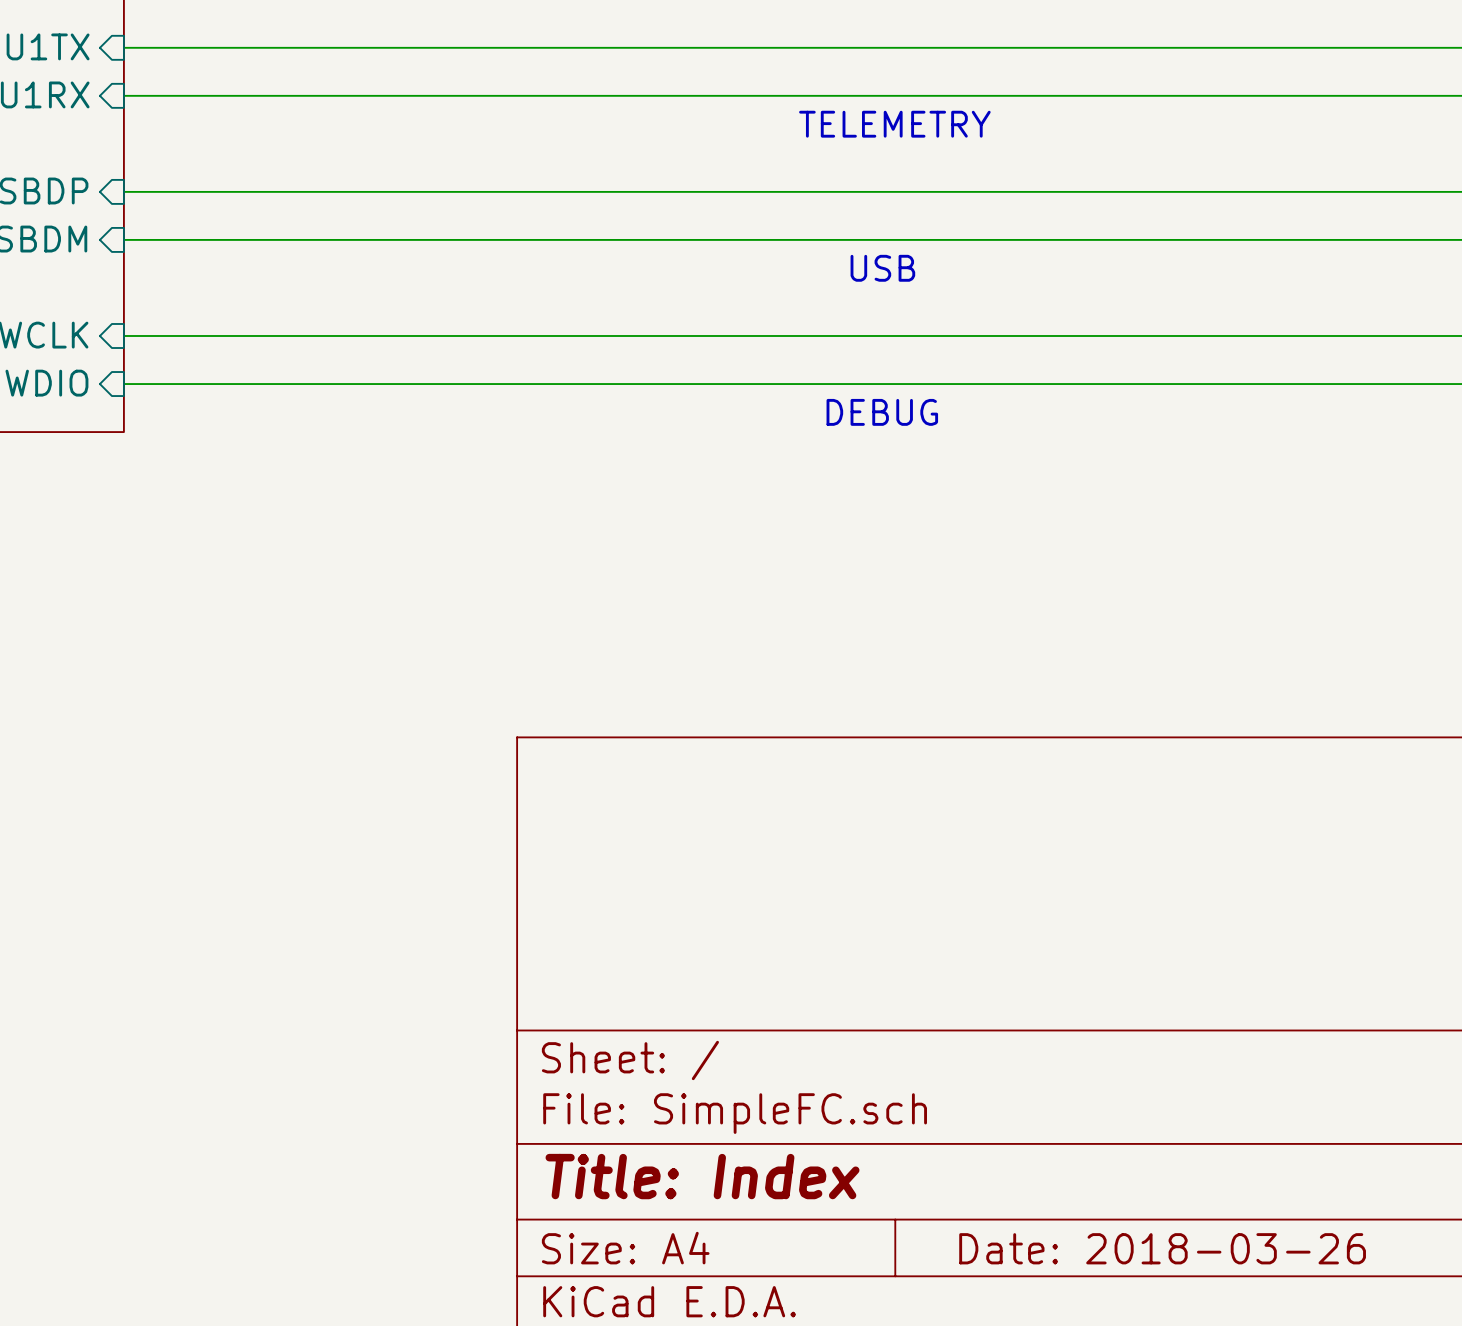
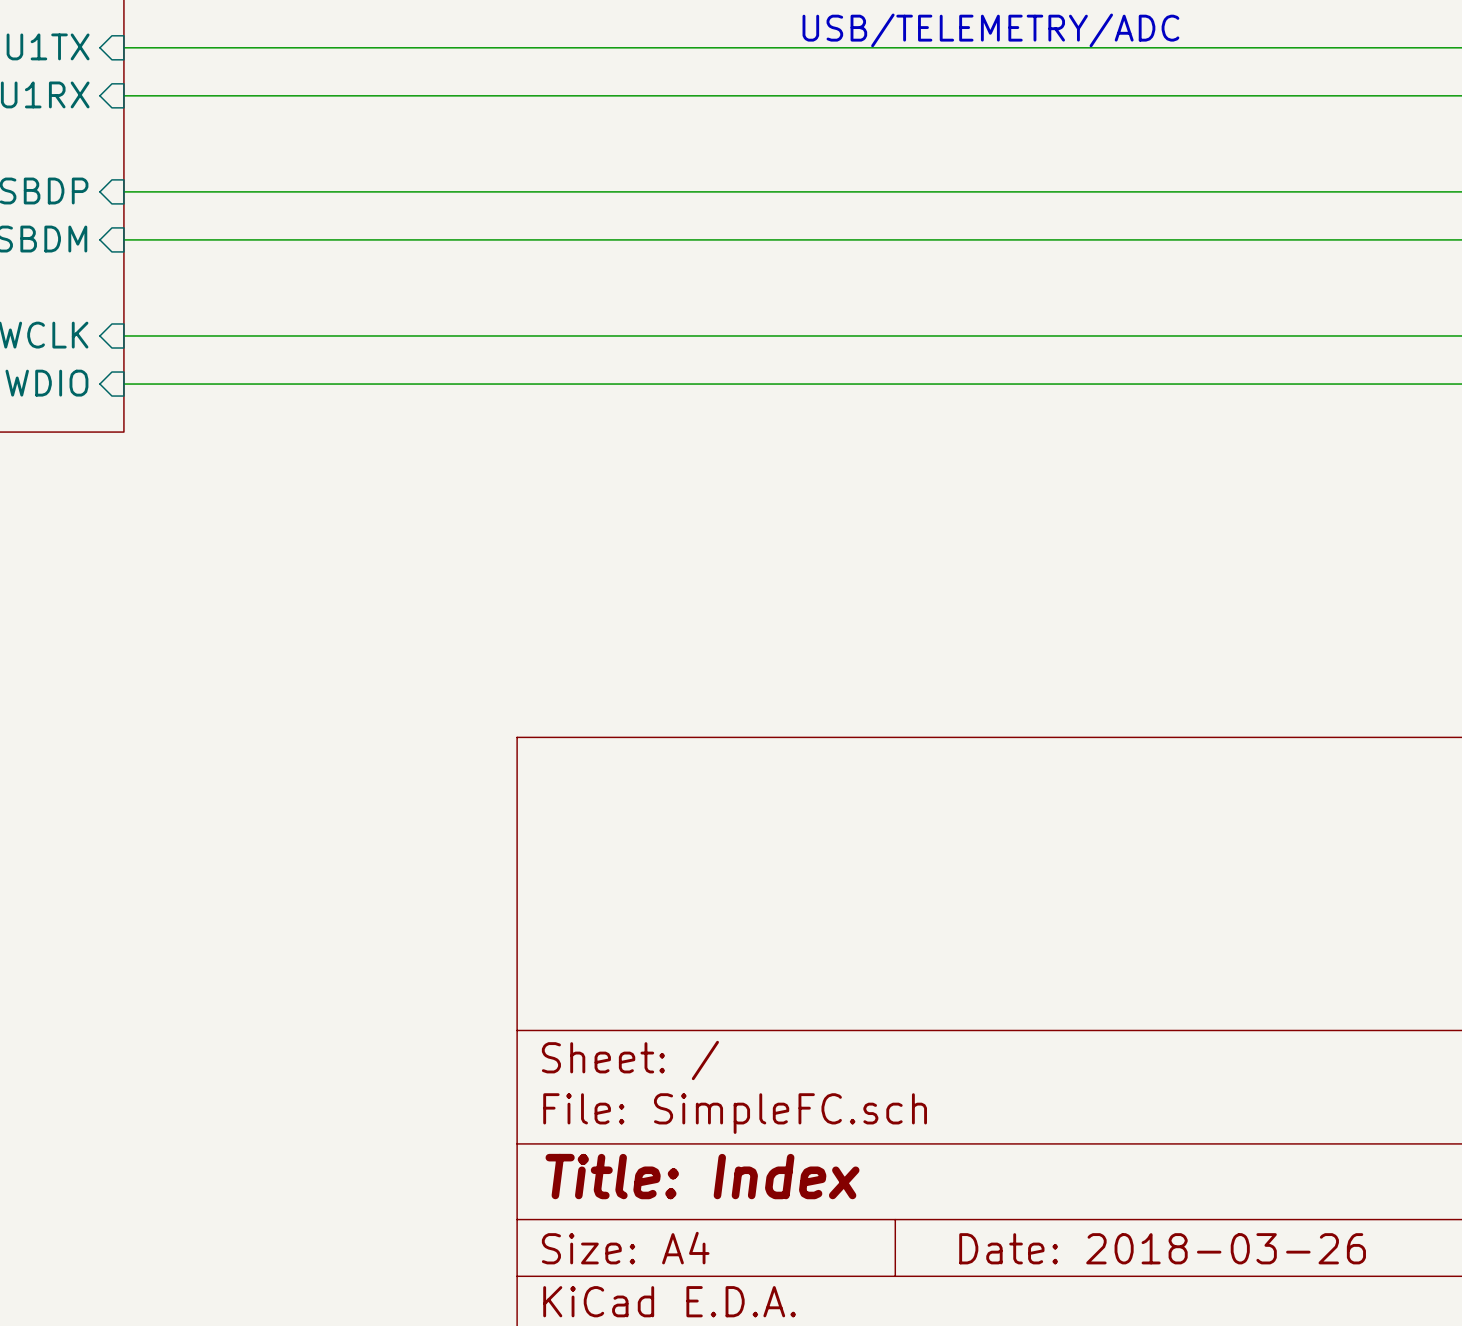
text: none -> USB/TELEMETRY/ADC (990, 30)
text: TELEMETRY (894, 124) -> none
text: USB (882, 268) -> none
text: DEBUG (882, 412) -> none

